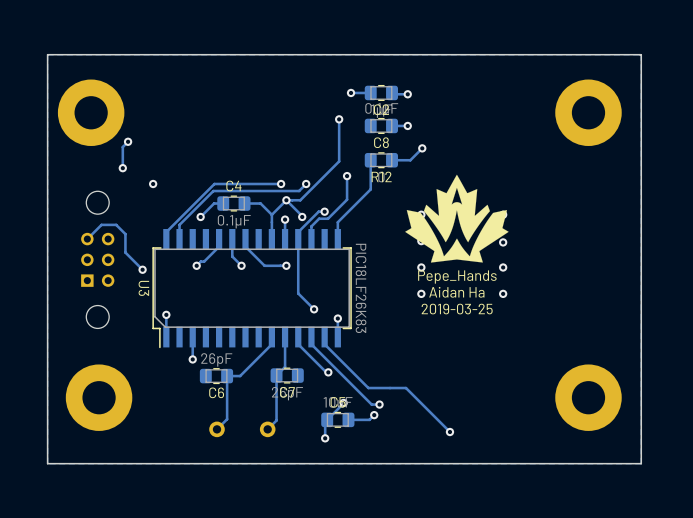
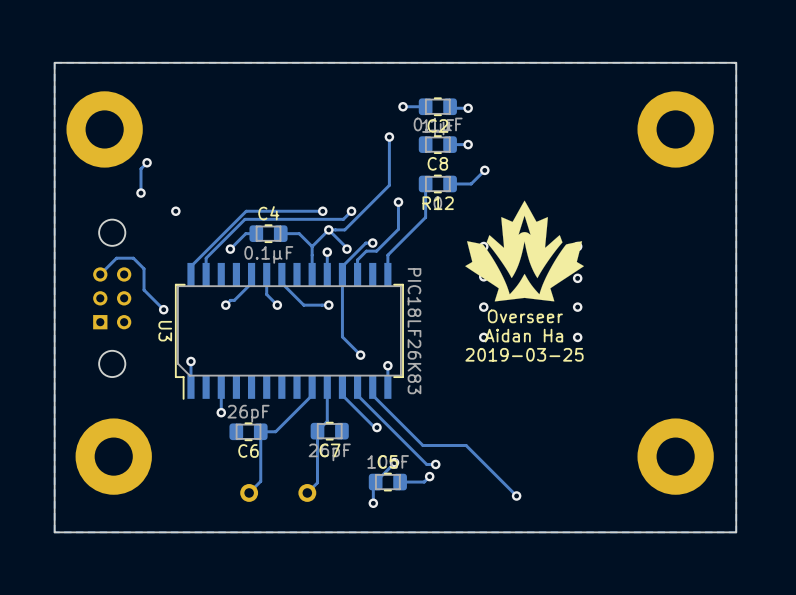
text: Pepe_Hands (457, 277) -> Overseer (525, 316)

